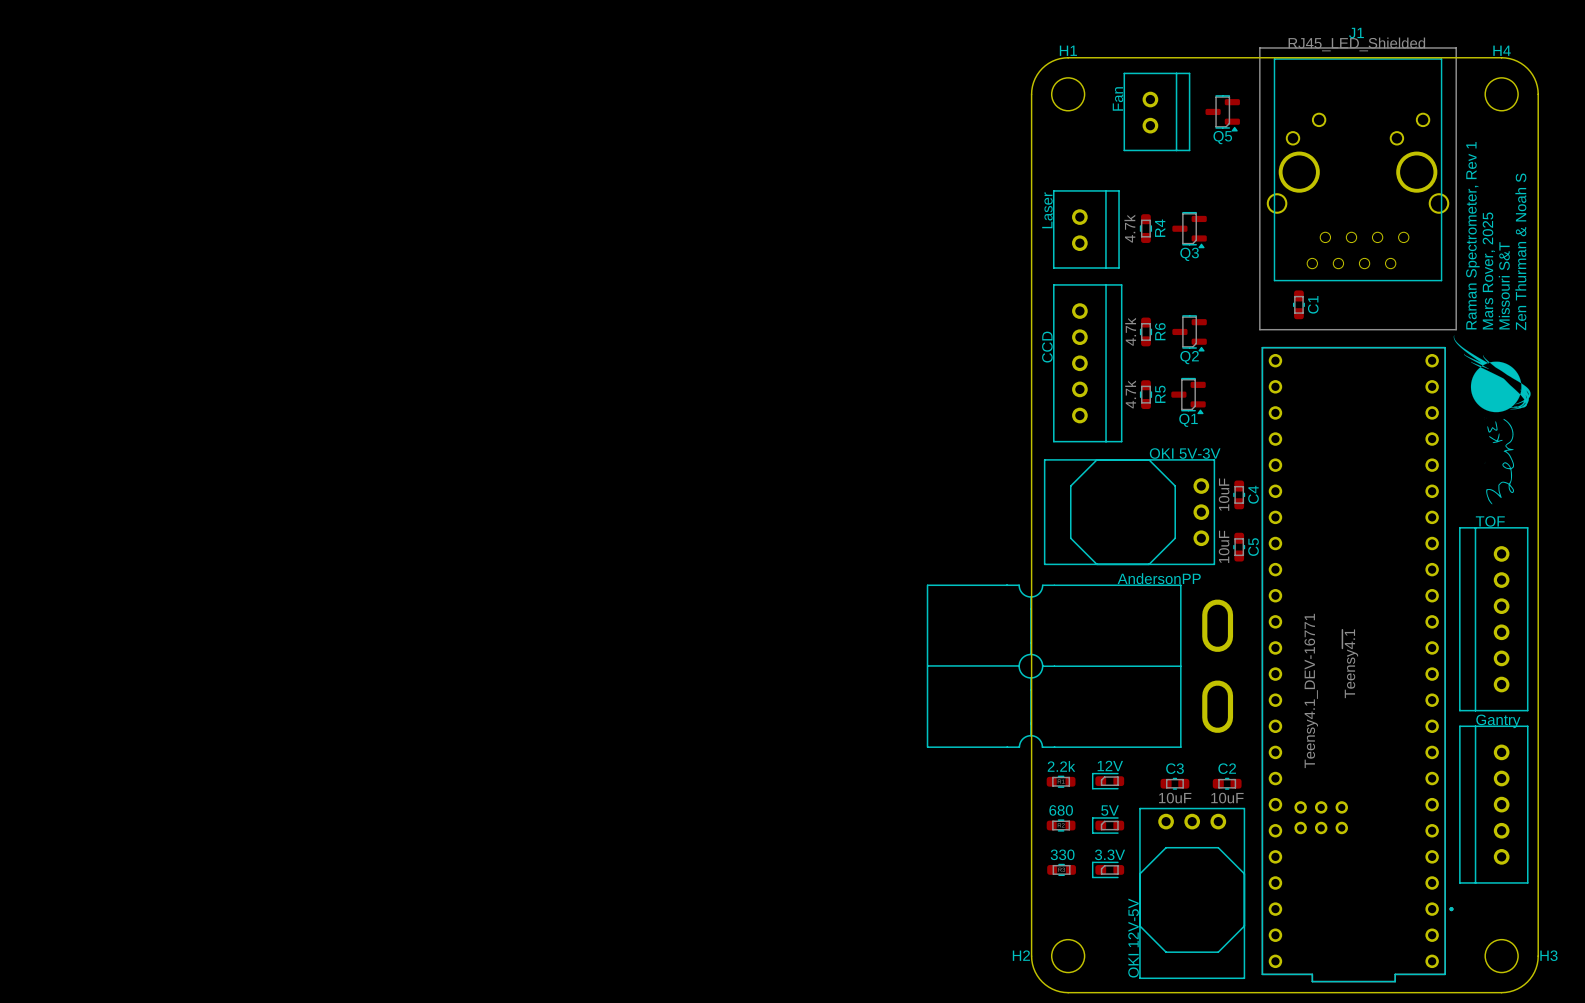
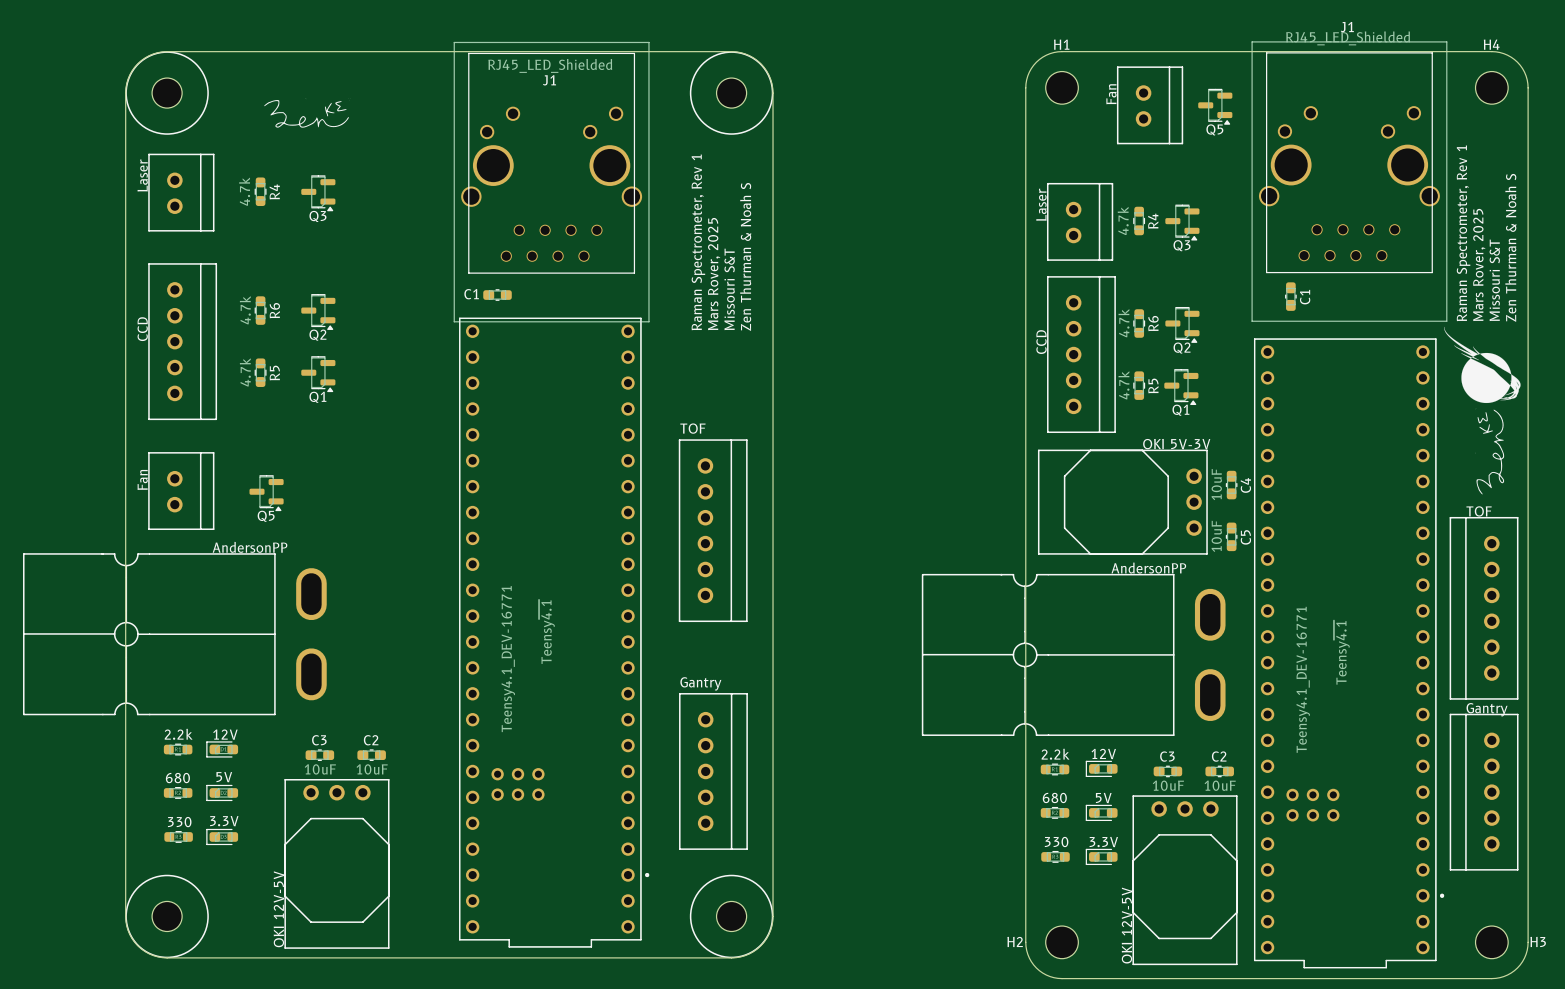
board edge: none -> (167, 51) (731, 51) (749, 55) (760, 63) (766, 71) (771, 83) (773, 93) (773, 916) (770, 930) (766, 938) (753, 951) (745, 955) (731, 957) (167, 957) (149, 953) (137, 945) (132, 938) (128, 930) (125, 916) (125, 93) (129, 75) (137, 63) (149, 55) (167, 51)
part: none -> (167, 93)
part: none -> (731, 93)
drawing: none -> [264, 98, 351, 128]
text: none -> Laser (142, 175)
J1: none -> RJ45_LED_Shielded (551, 182)
part: none -> (181, 192)
R4: none -> 4.7k (260, 191)
Q3: none -> (318, 193)
text: none -> Raman Spectrometer, Rev 1 (698, 242)
text: none -> Zen Thurman & Noah S (745, 256)
text: none -> Mars Rover, 2025 (714, 274)
text: none -> Missouri S&T (729, 289)
C1: none -> (497, 295)
R6: none -> 4.7k (260, 310)
Q2: none -> (318, 312)
text: none -> CCD (142, 329)
part: none -> (182, 341)
R5: none -> 4.7k (260, 372)
Q1: none -> (318, 374)
text: none -> TOF (692, 428)
text: none -> Fan (142, 479)
part: none -> (181, 491)
Q5: none -> (266, 493)
part: none -> (713, 530)
text: none -> AndersonPP (250, 547)
part: none -> Teensy4.1_DEV-16771 (554, 632)
part: none -> (174, 634)
text: none -> Gantry (700, 683)
part: none -> 2.2k (178, 749)
part: none -> 12V (222, 749)
C3: none -> 10uF (319, 755)
C2: none -> 10uF (371, 755)
part: none -> (713, 771)
part: none -> 680 (178, 792)
part: none -> 5V (222, 792)
part: none -> 330 (178, 836)
part: none -> 3.3V (222, 836)
part: none -> (336, 863)
text: none -> OKI 12V-5V (278, 909)
part: none -> (167, 916)
part: none -> (731, 916)

